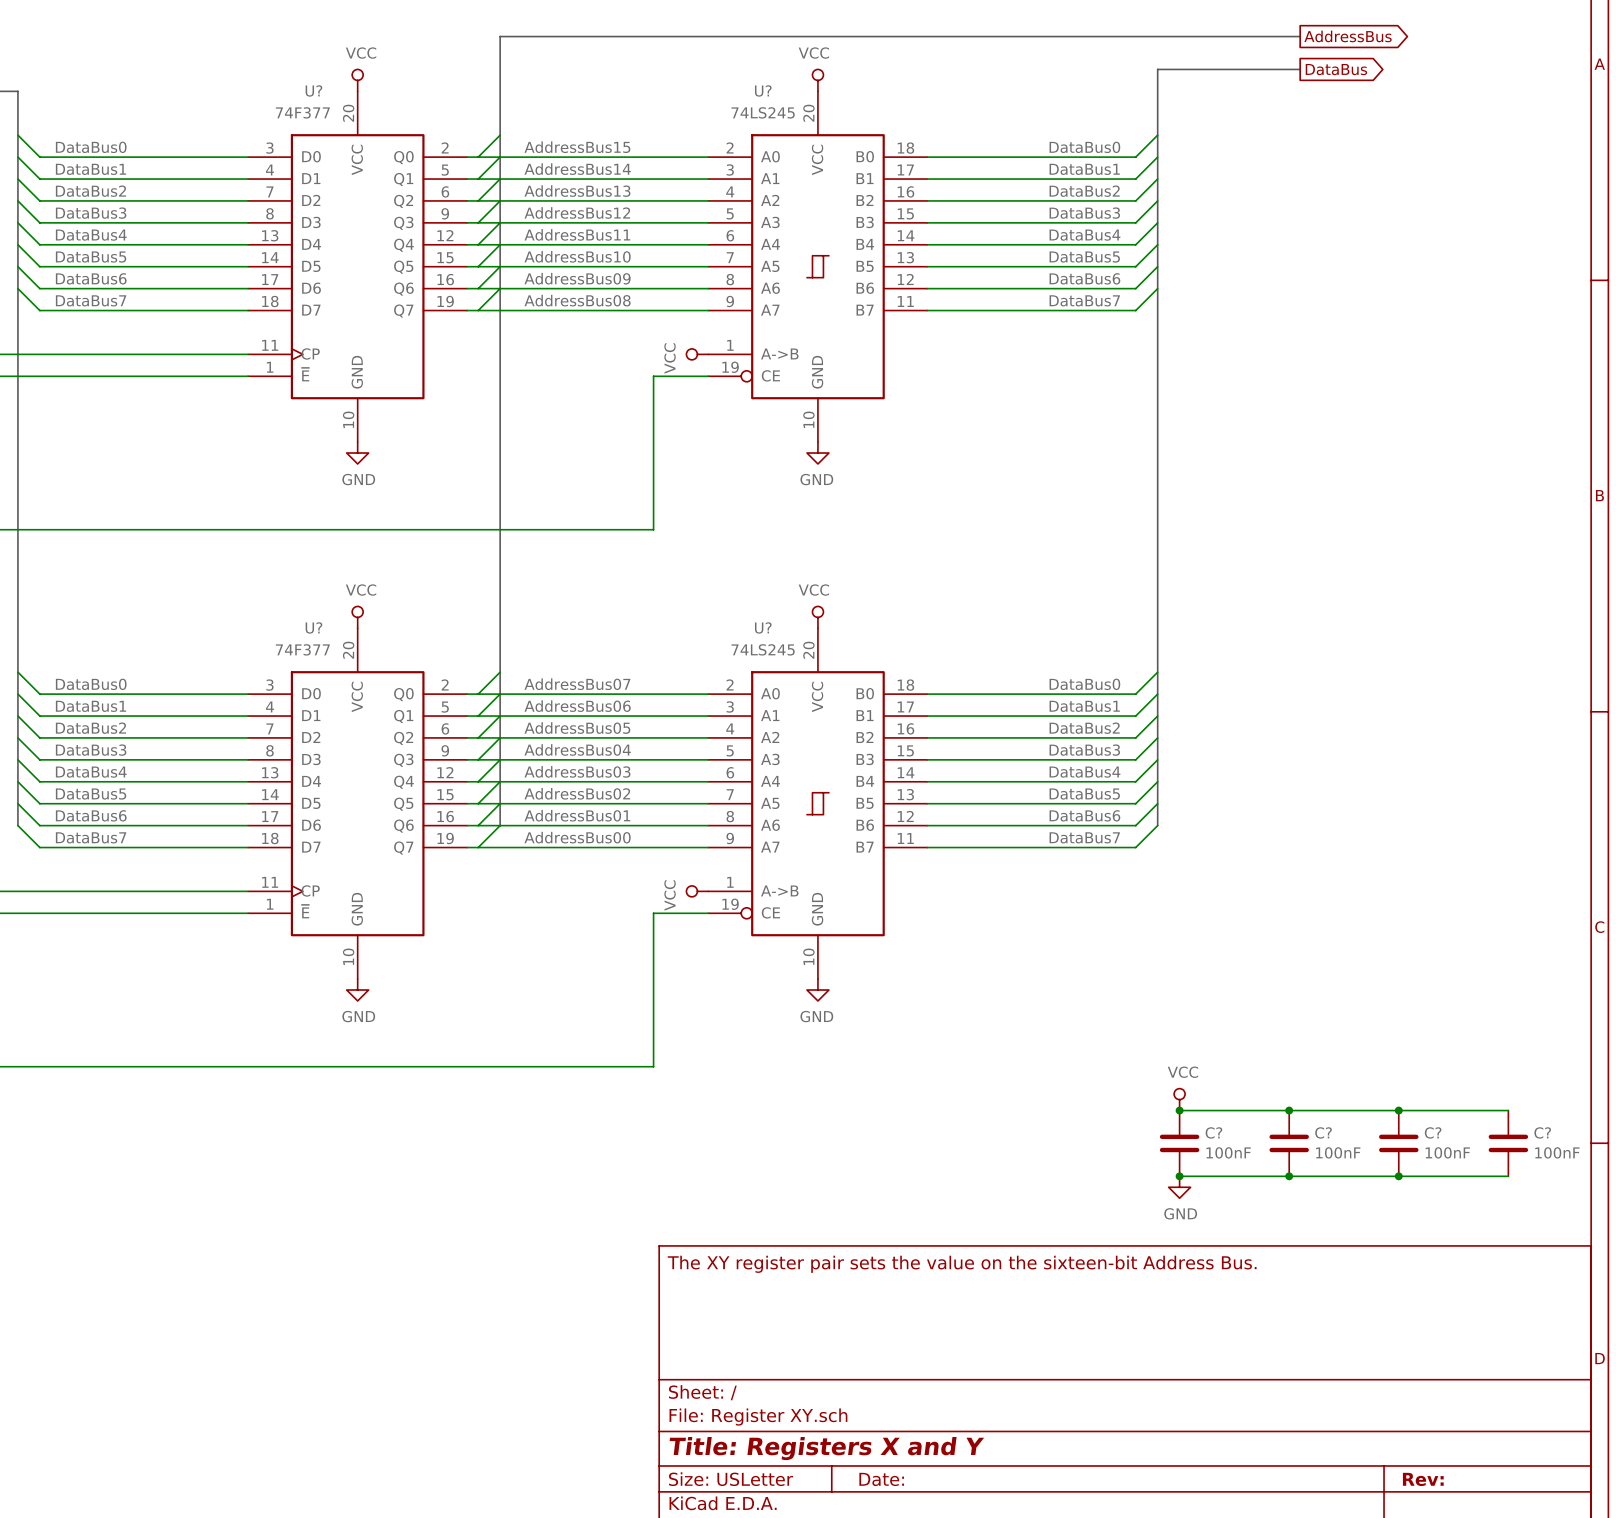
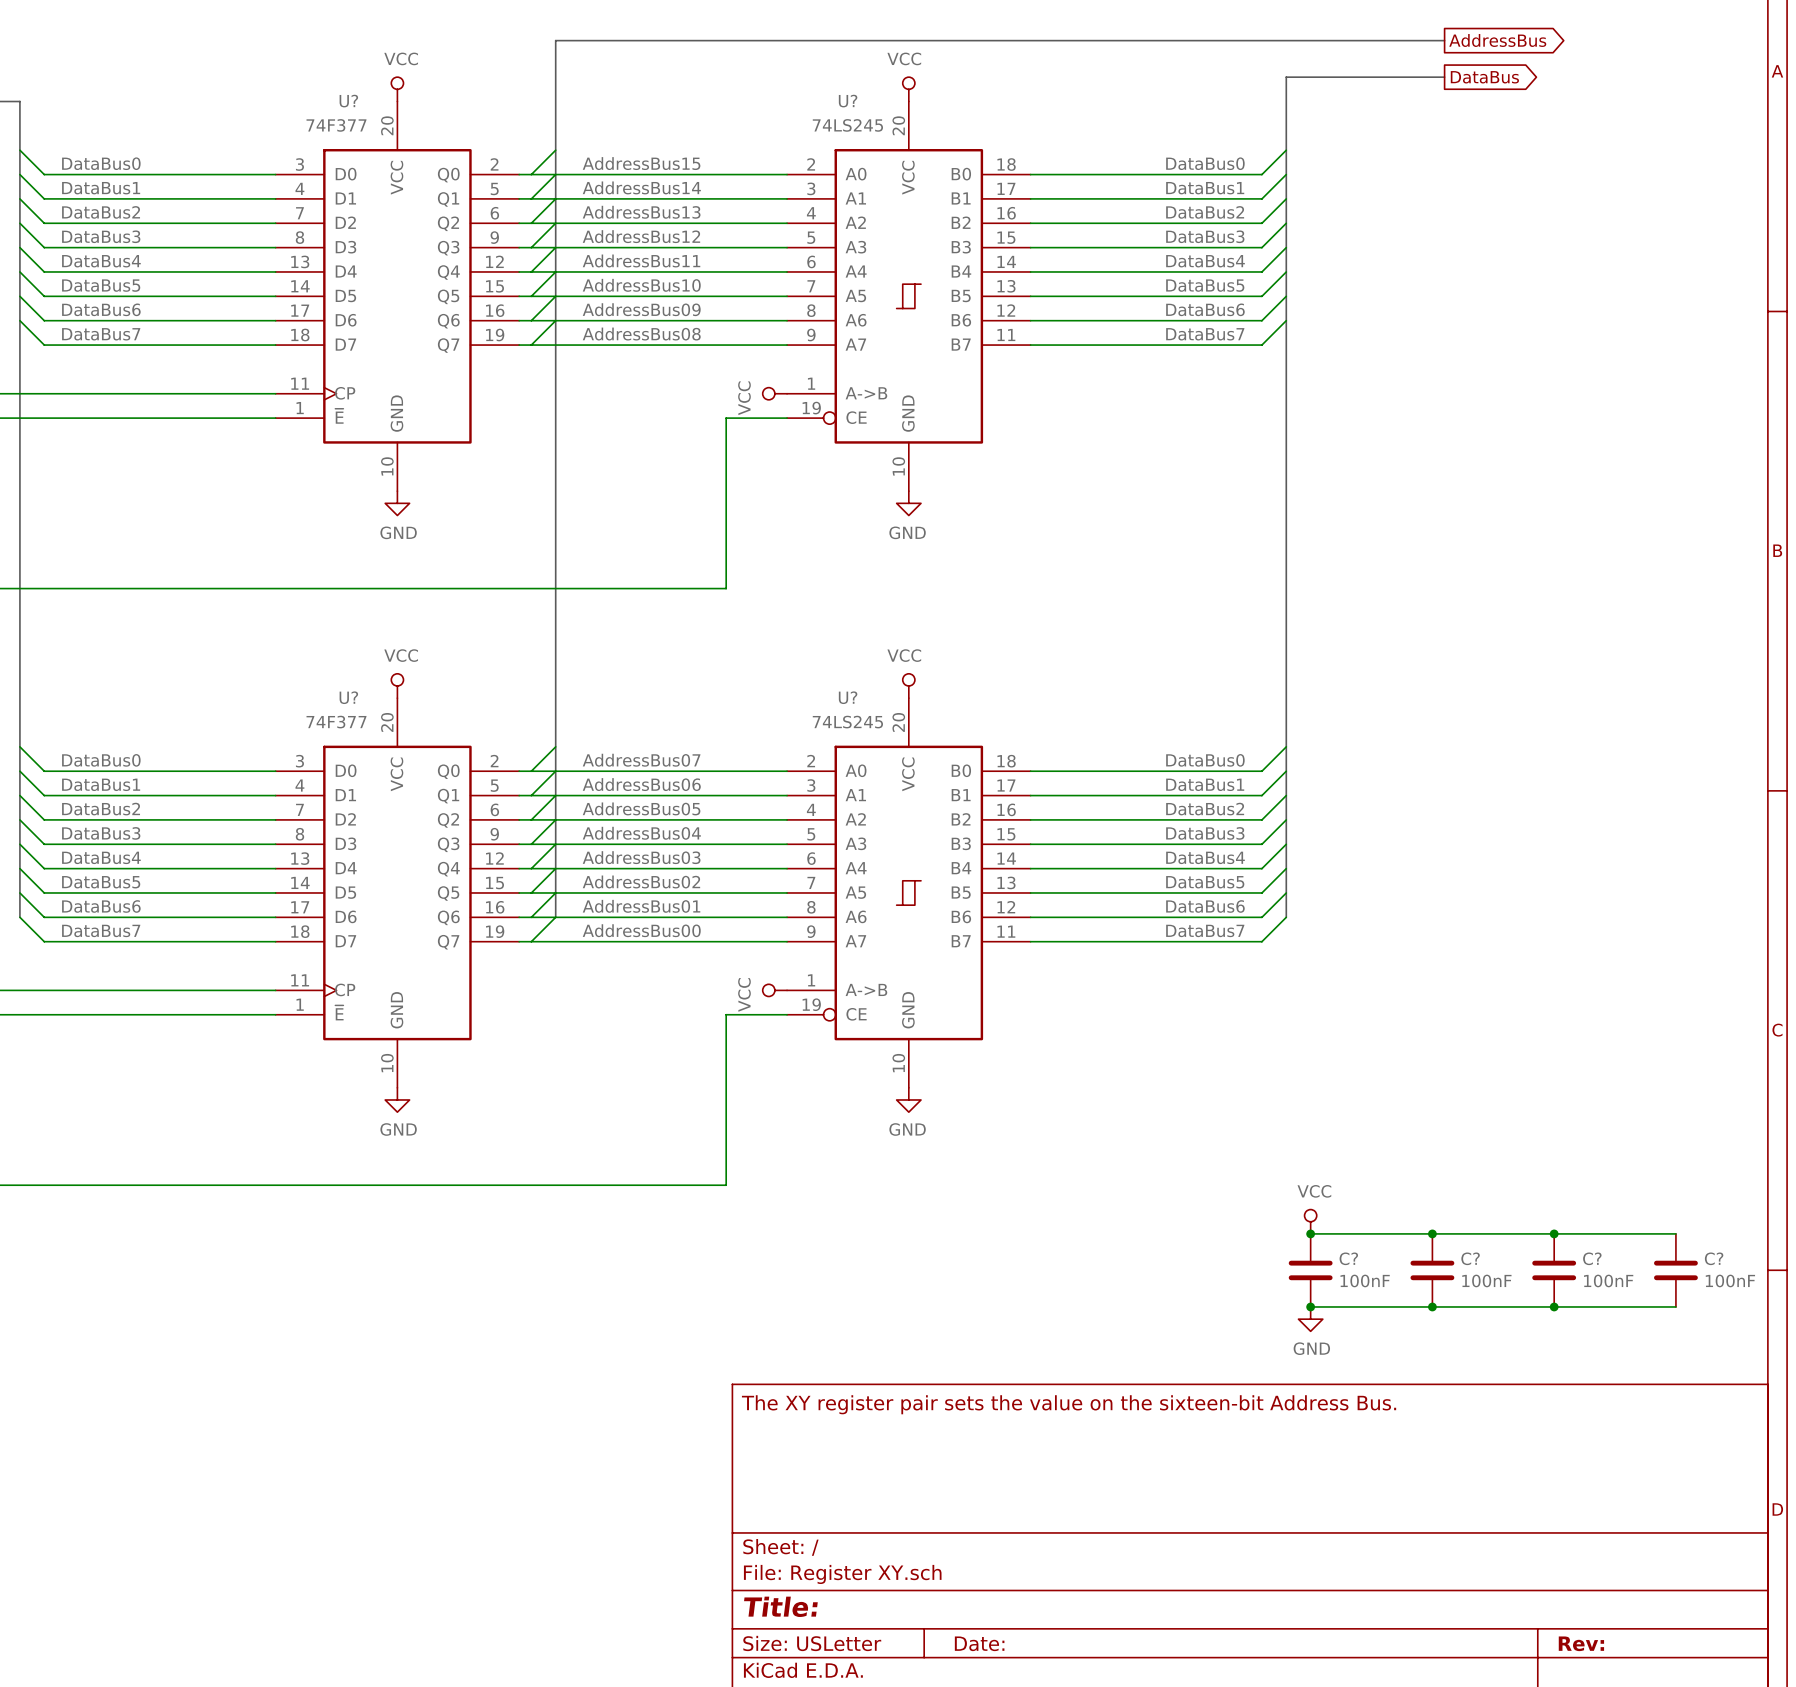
title block: Title: Registers X and Y (826, 1448) -> Title: (780, 1606)

